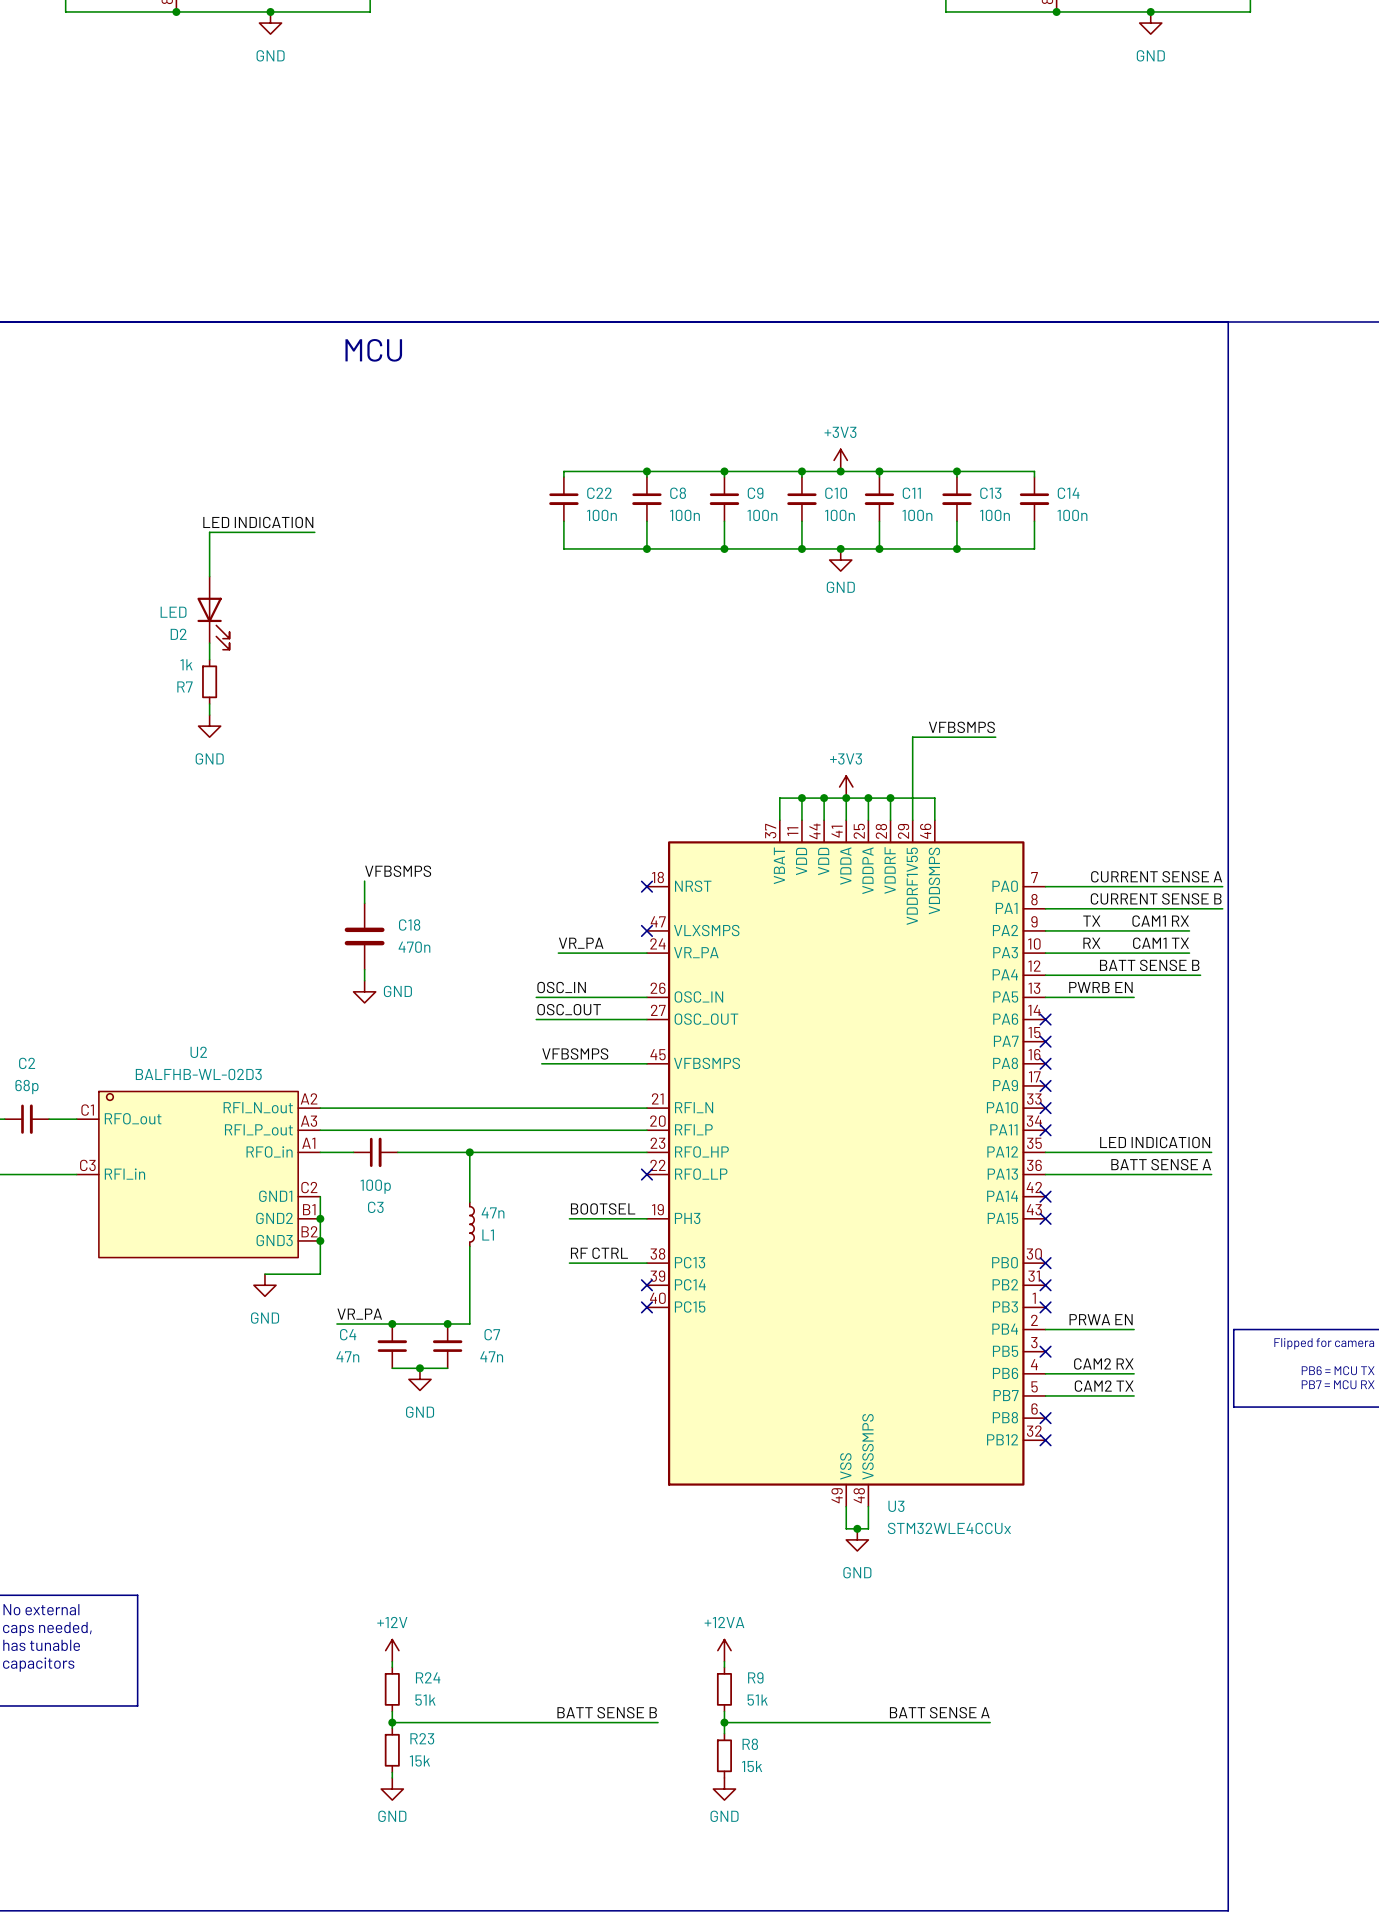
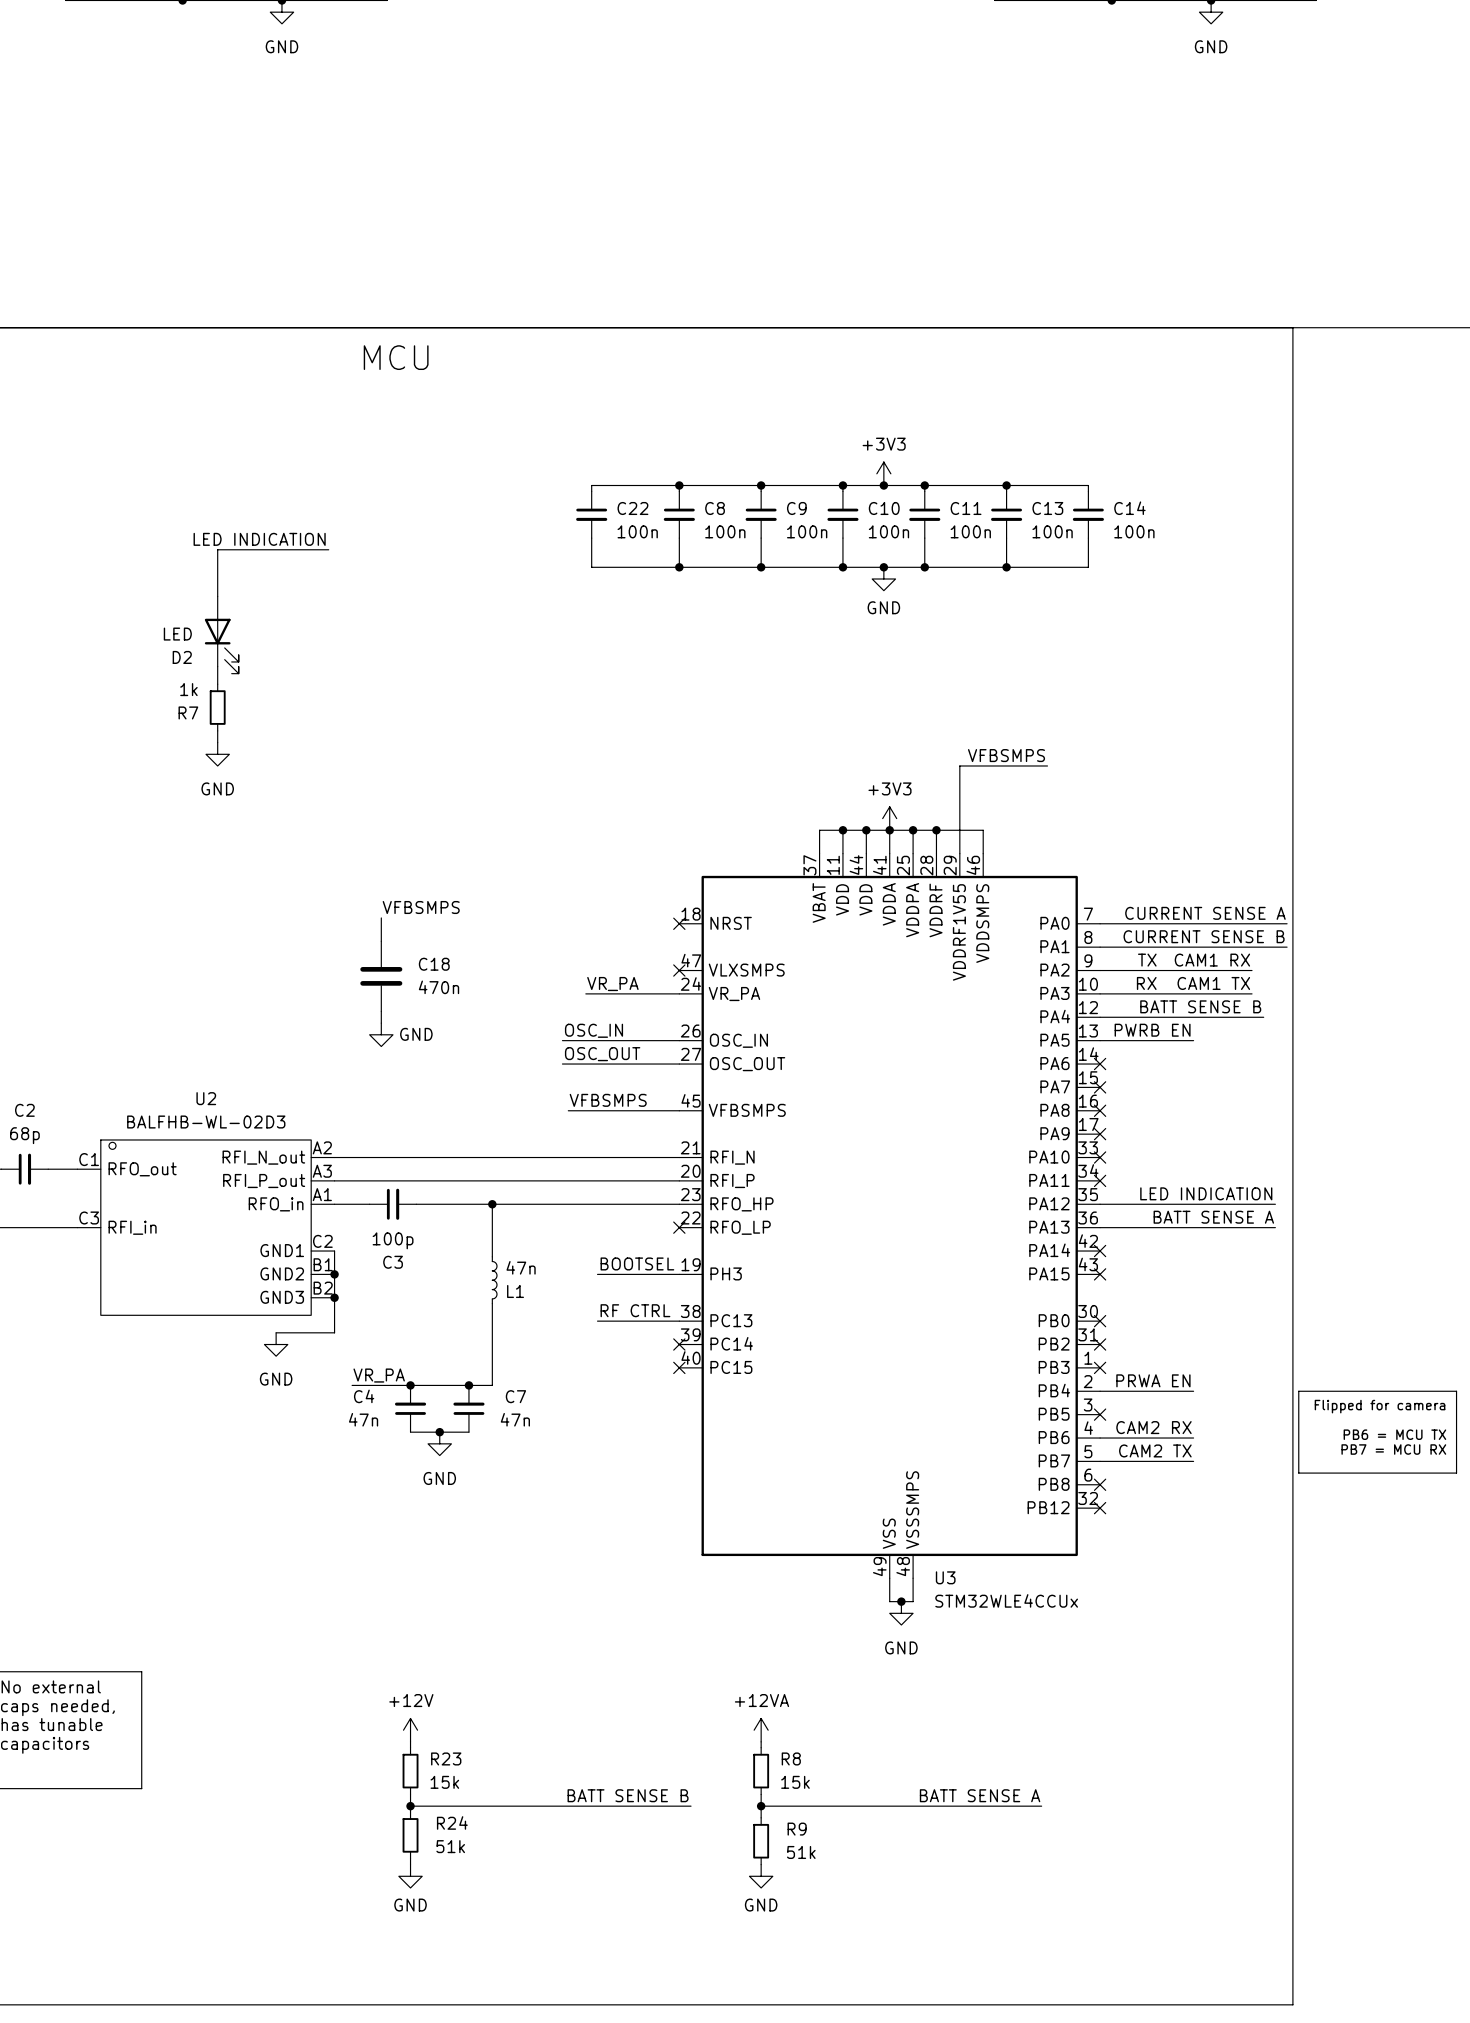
R24 name: R24 (428, 1677) -> R23 (446, 1758)
R9 name: R9 (755, 1677) -> R8 (791, 1758)
R24 value: 51k (425, 1700) -> 15k (444, 1782)
R9 value: 51k (757, 1700) -> 15k (795, 1782)
R23 name: R23 (422, 1738) -> R24 (452, 1822)
R8 name: R8 (750, 1744) -> R9 (797, 1829)
R23 value: 15k (419, 1760) -> 51k (450, 1846)
R8 value: 15k (752, 1766) -> 51k (801, 1852)

